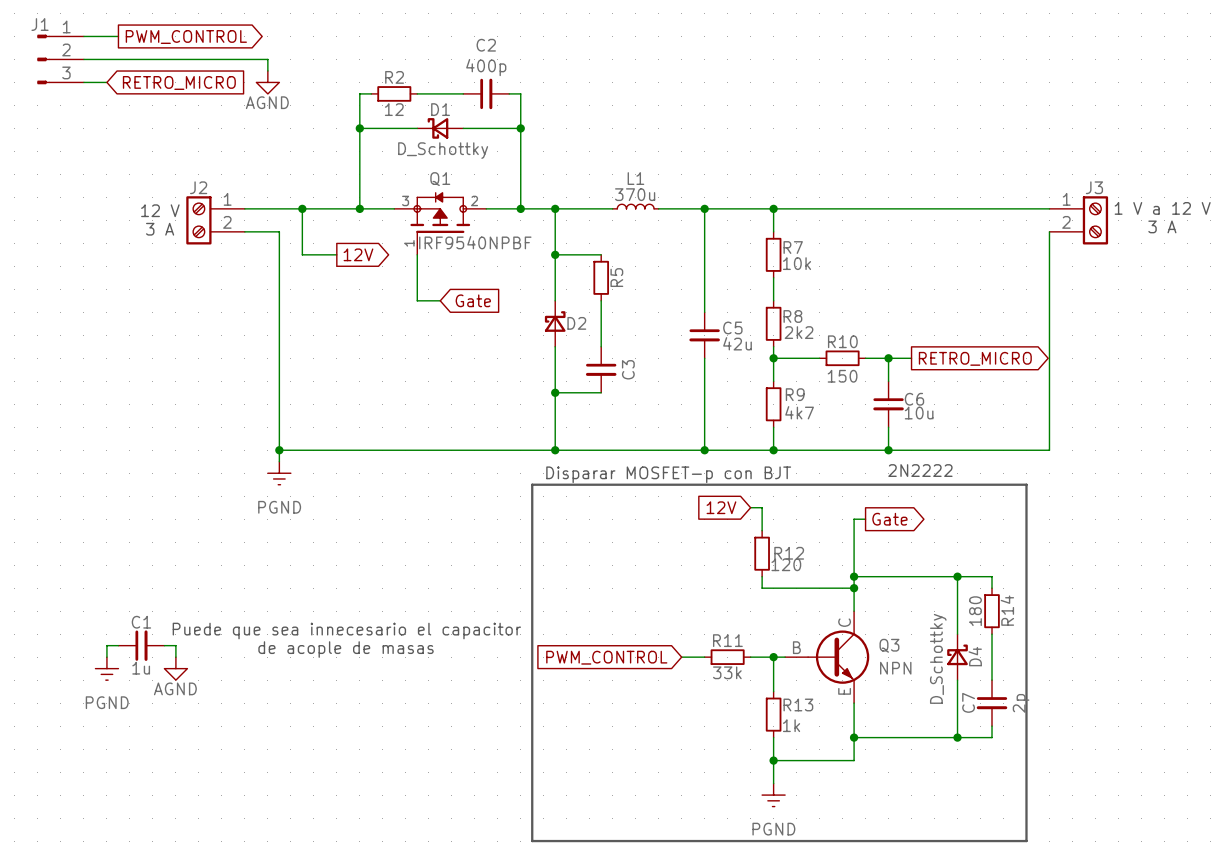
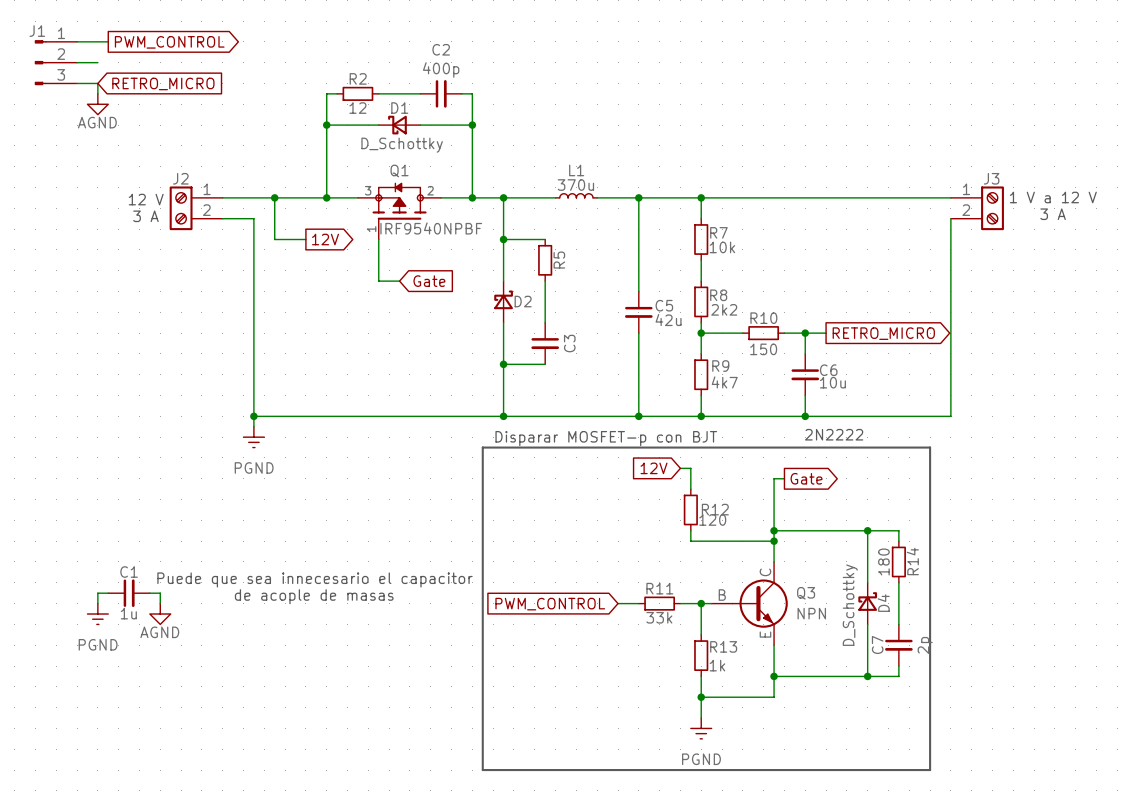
wire: (106, 59) (267, 59) (267, 70) -> none
wire: none -> (97, 83) (97, 93)
power symbol position: AGND (267, 82) -> AGND (97, 104)

